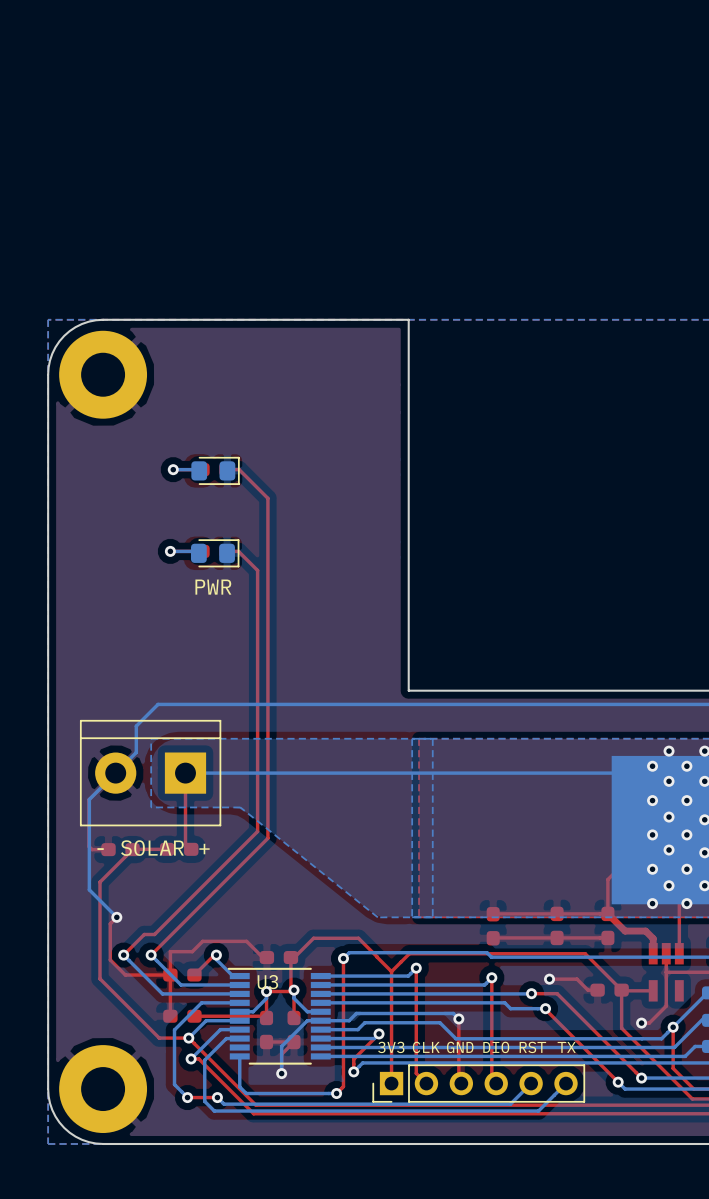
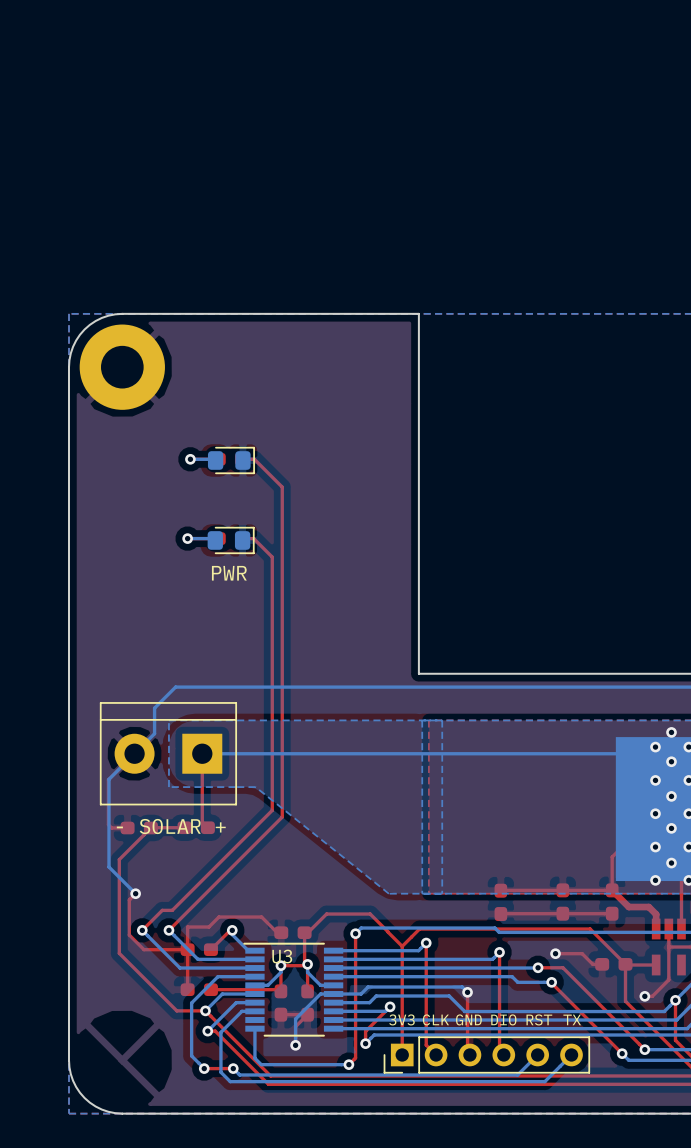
part: (103, 1089) -> none

